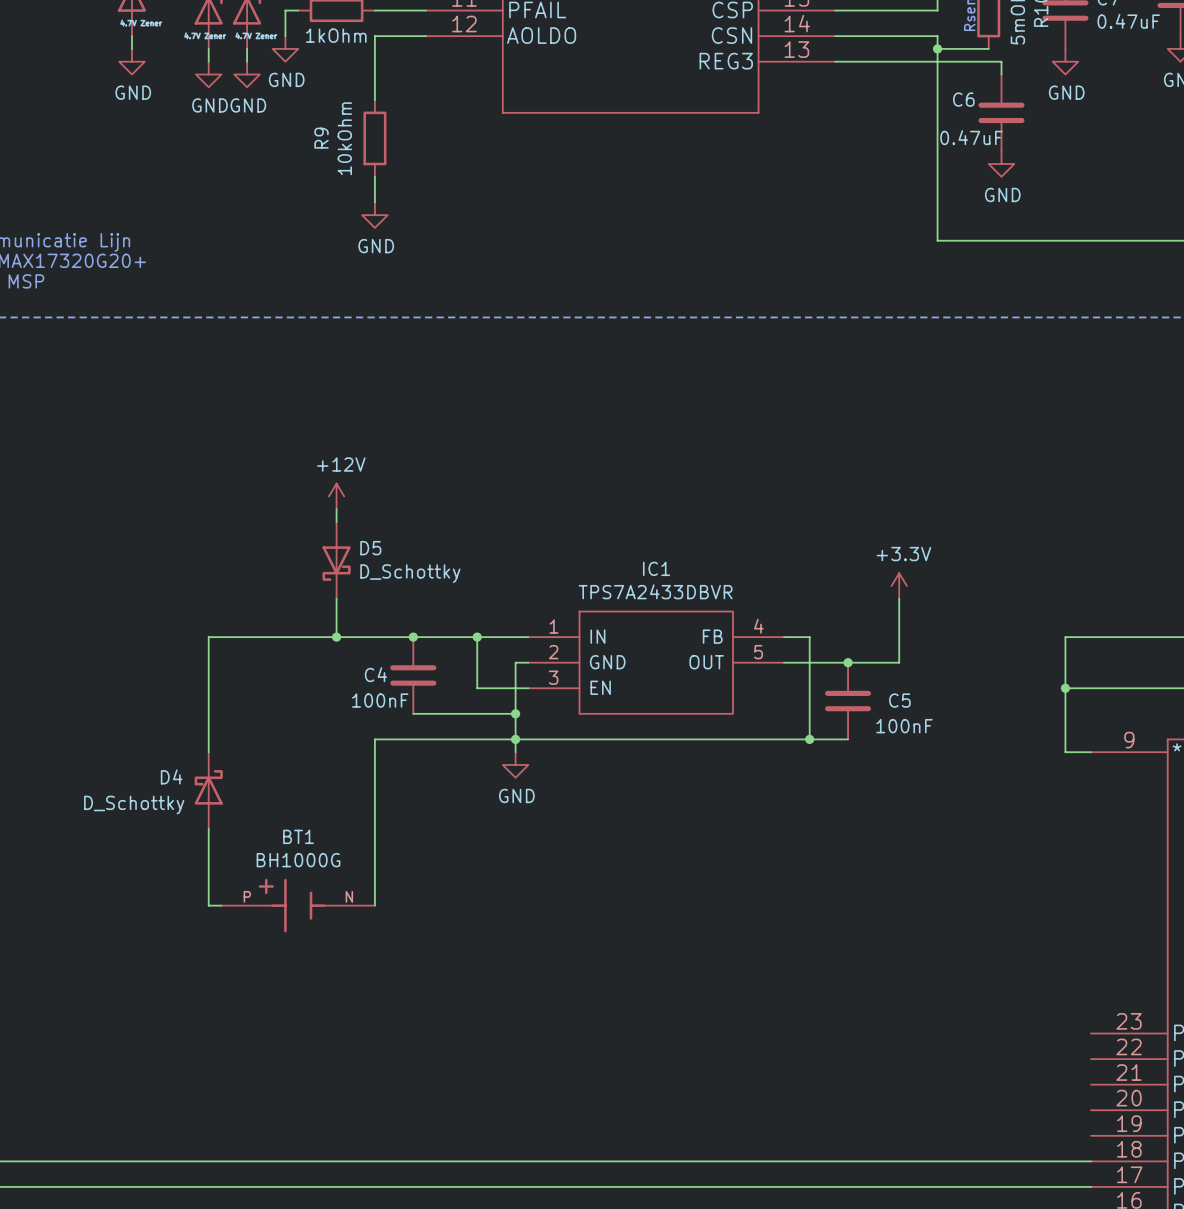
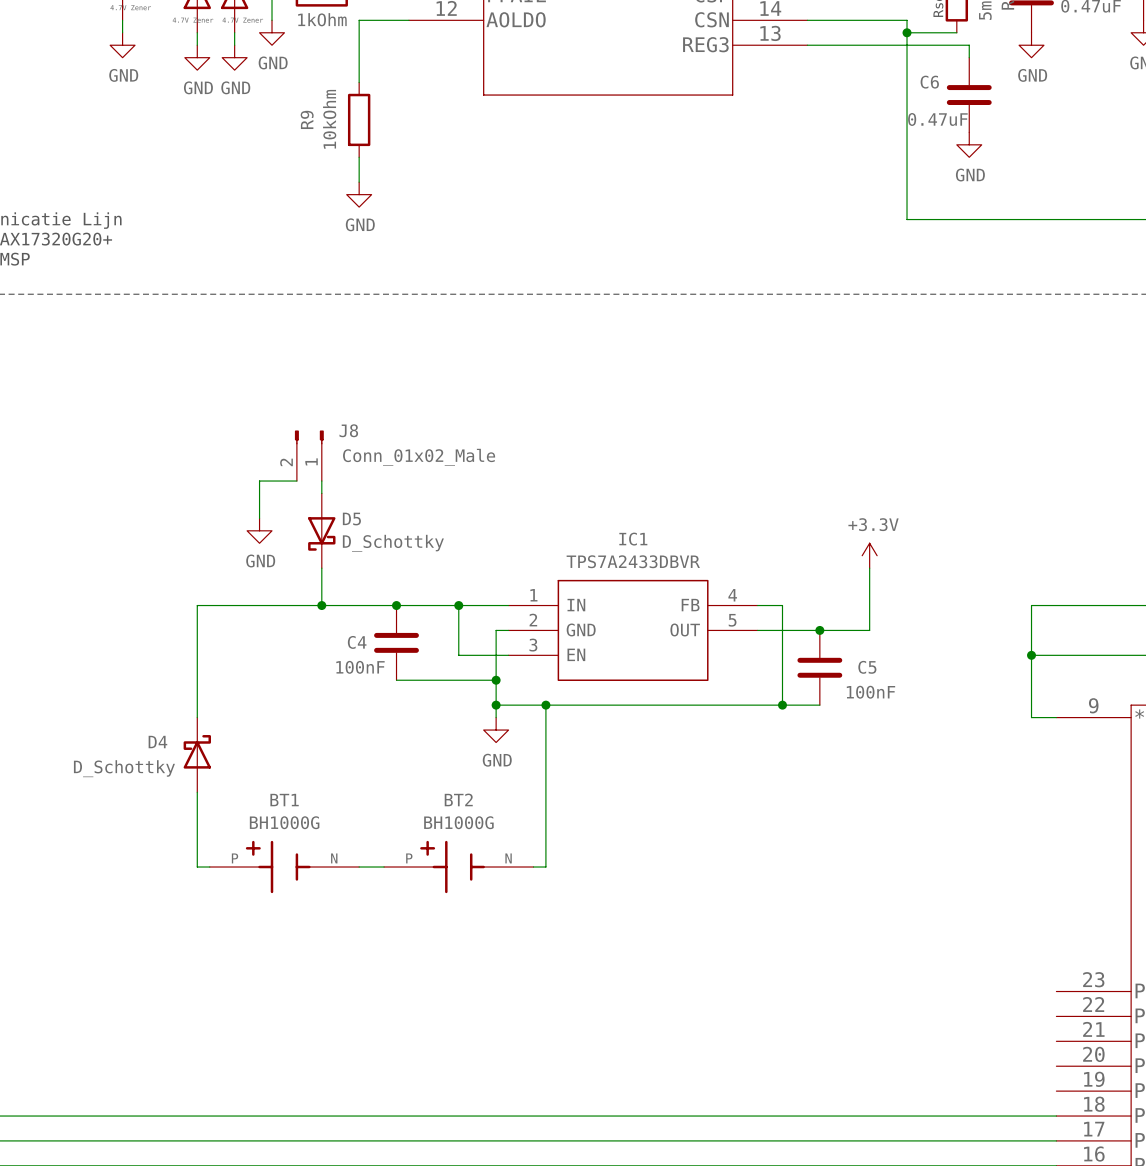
J8: none -> Conn_01x02_Male (309, 455)
power symbol: +12V (336, 496) -> none
wire: none -> (296, 481) (259, 481) (259, 518)
power symbol: none -> GND (259, 530)
wire: (515, 739) (374, 739) (374, 905) -> (384, 867) (359, 867)
wire: none -> (545, 705) (545, 867) (533, 867)
junction: none -> (545, 705)
BT2: none -> BH1000G (458, 867)

